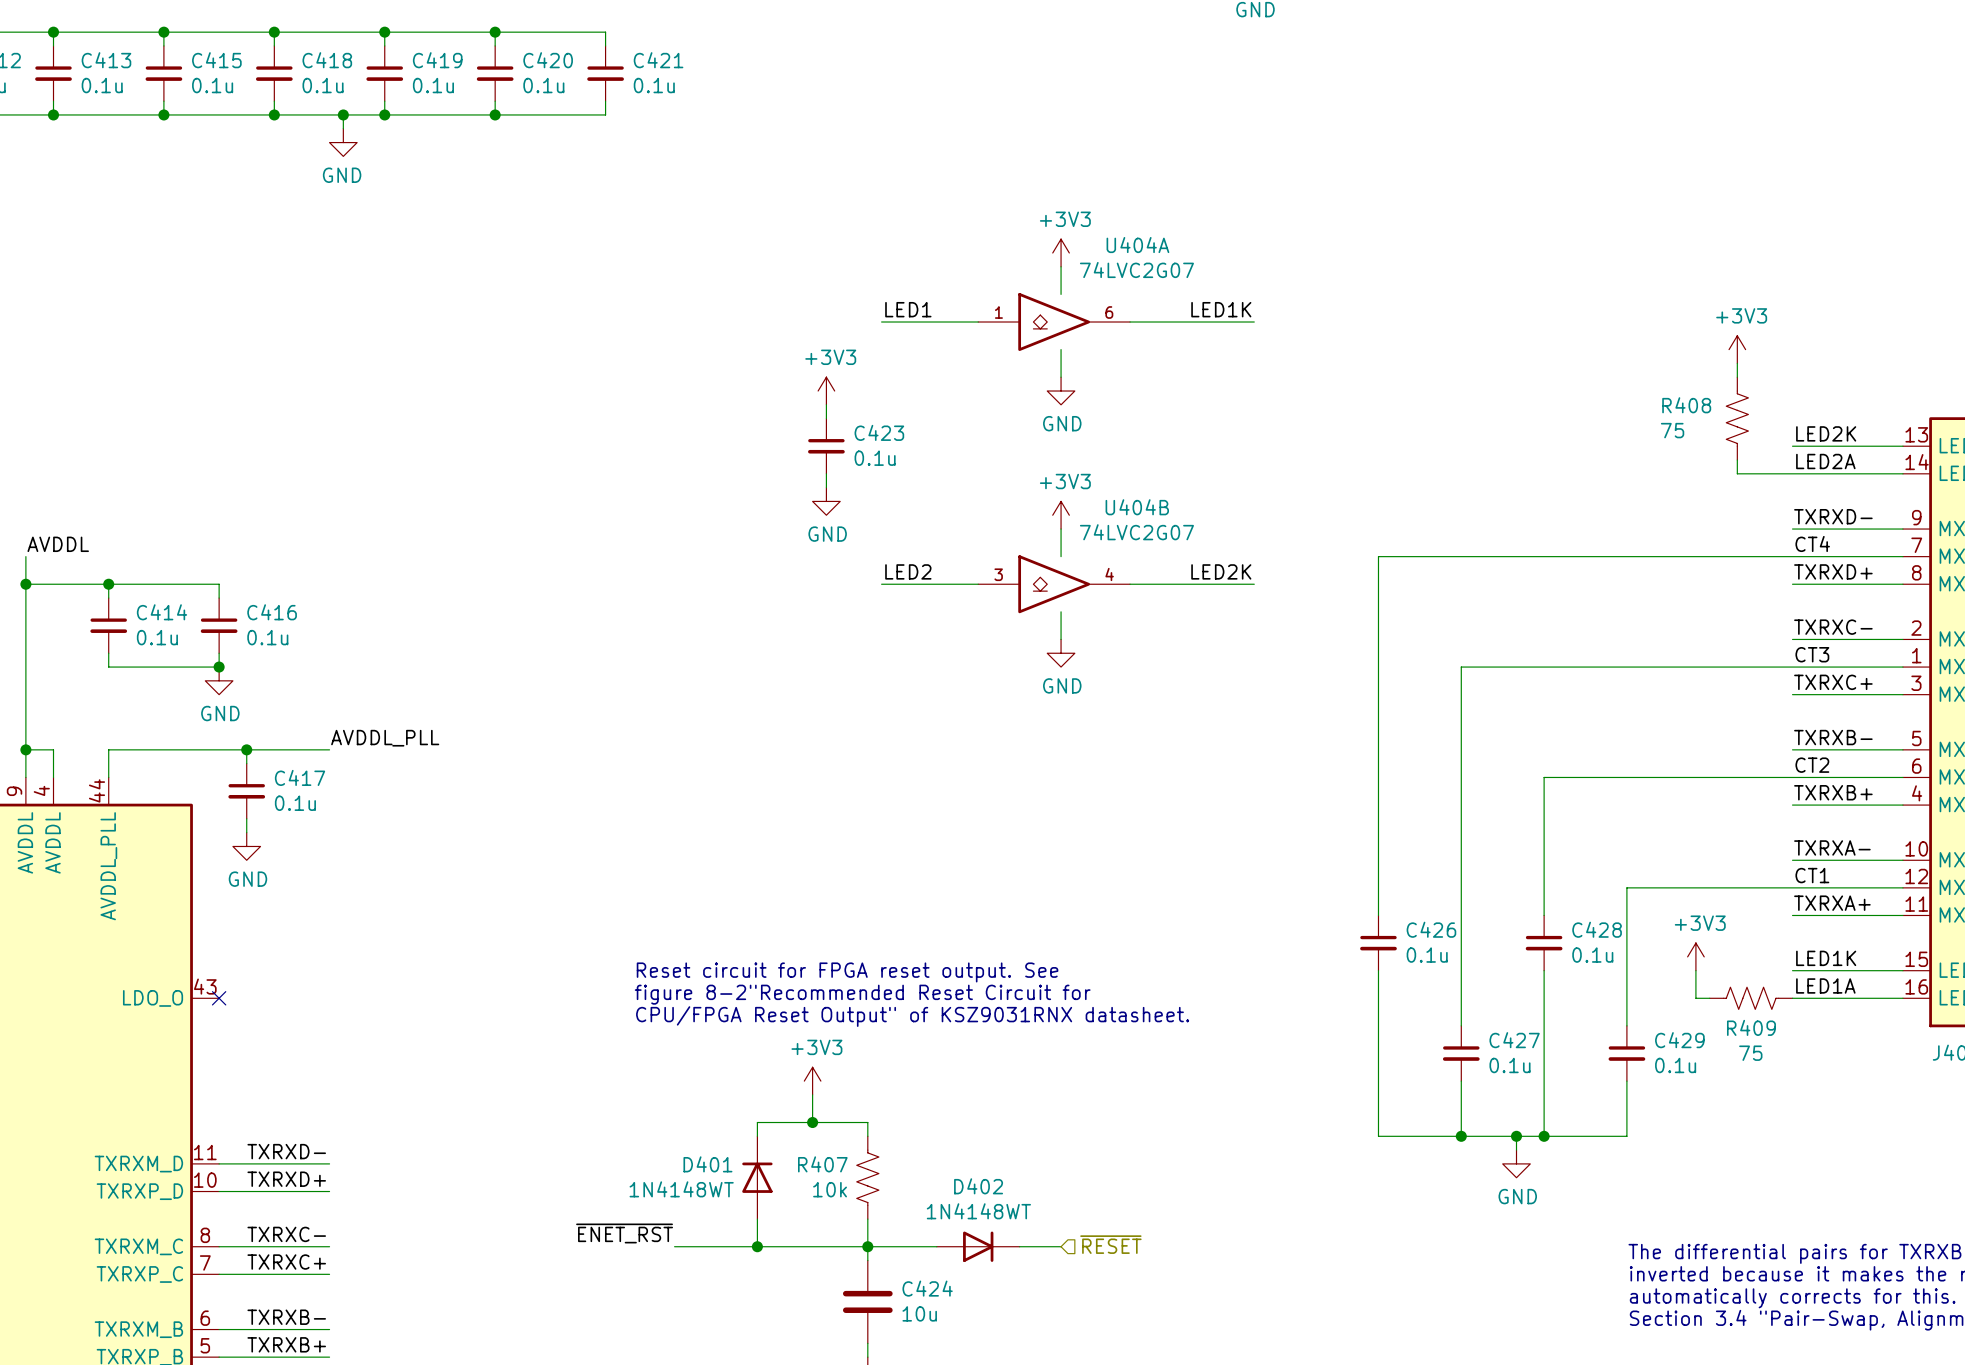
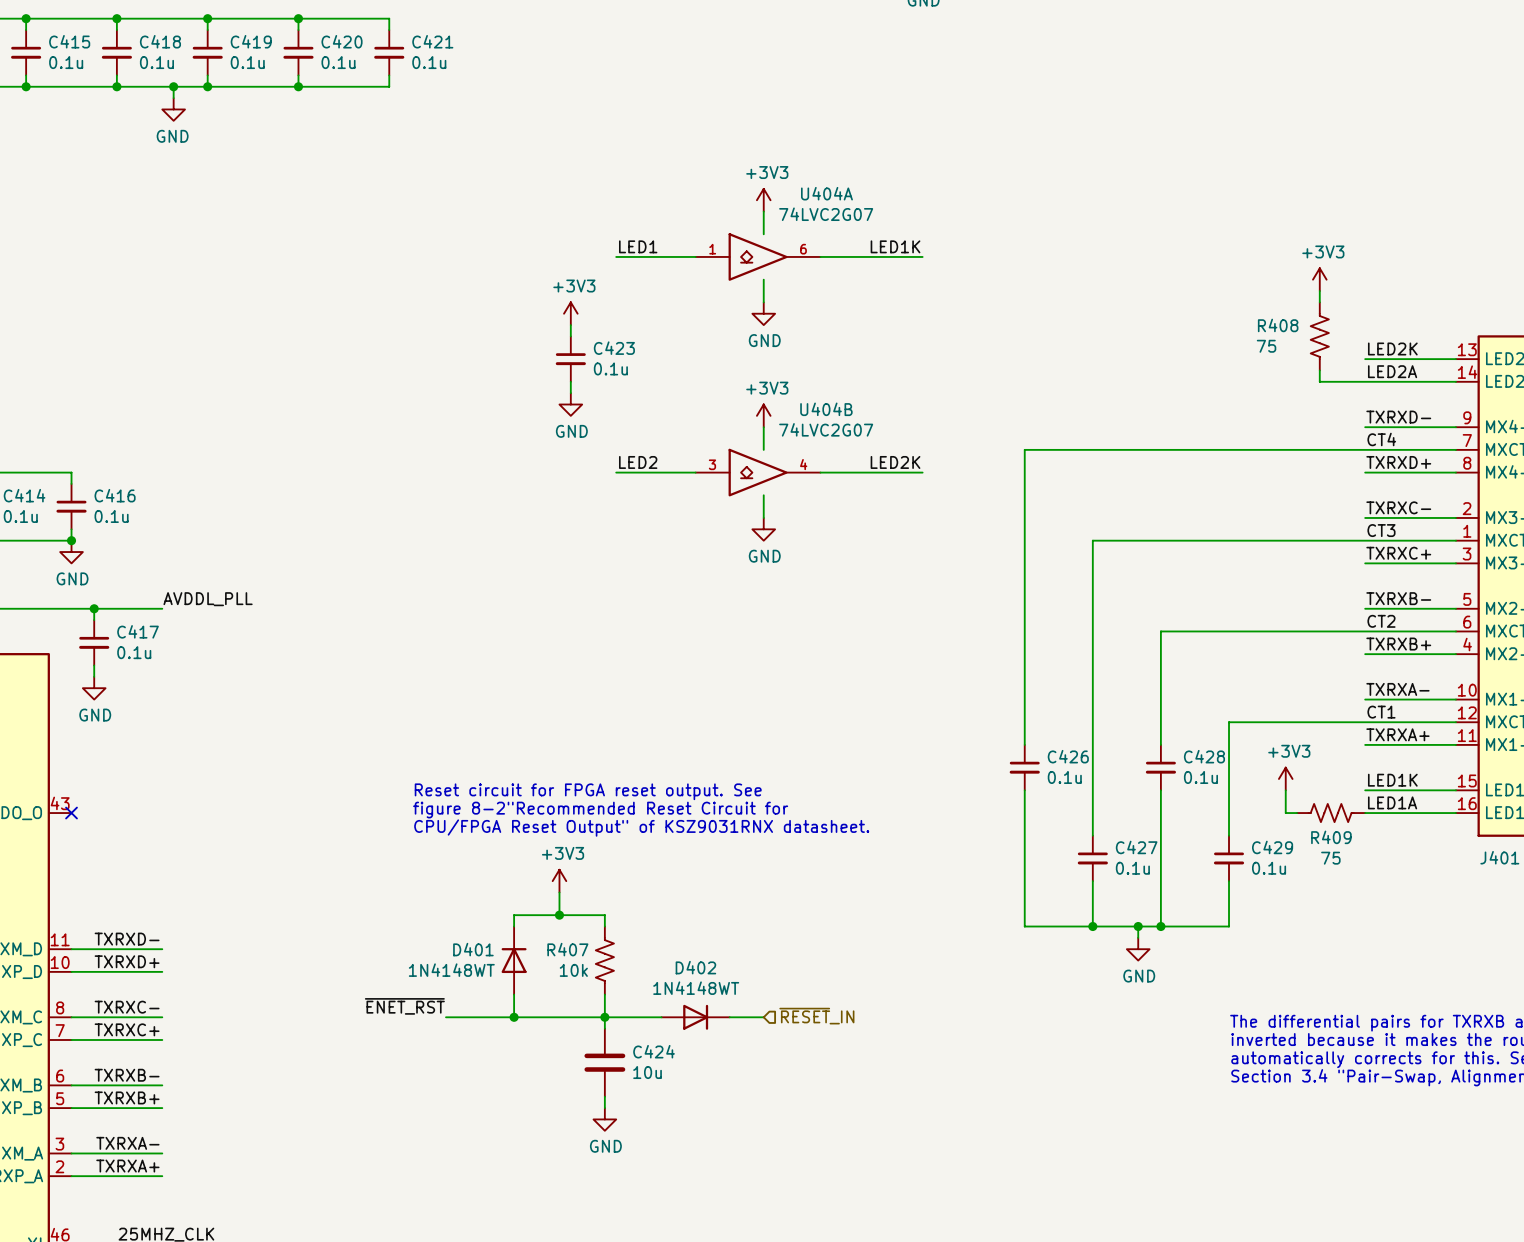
hierarchical label: ~{RESET} (1110, 1244) -> ~{RESET}_IN (816, 1016)

